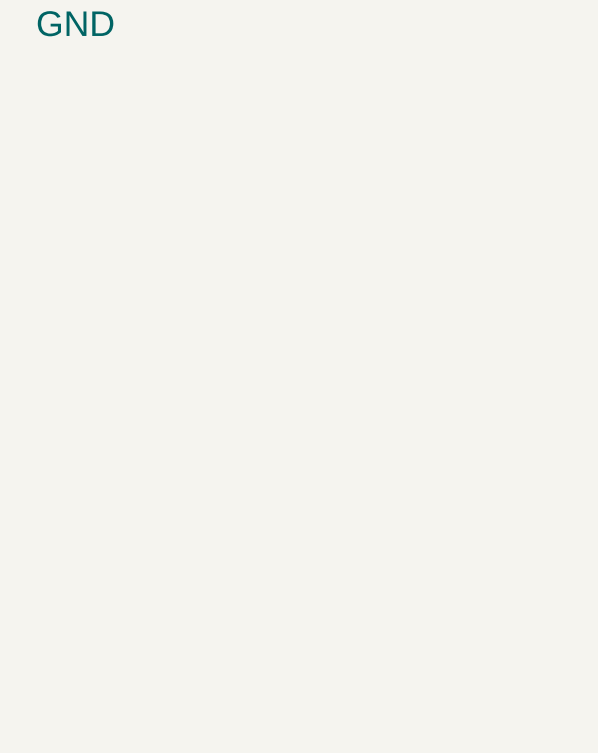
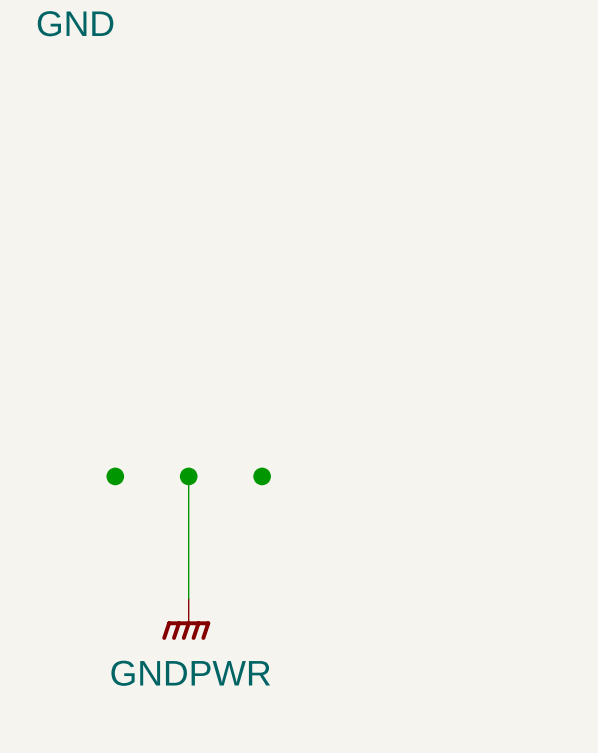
junction: none -> (115, 476)
wire: none -> (188, 476) (188, 598)
junction: none -> (188, 476)
junction: none -> (262, 476)
power symbol: none -> GNDPWR (186, 619)

